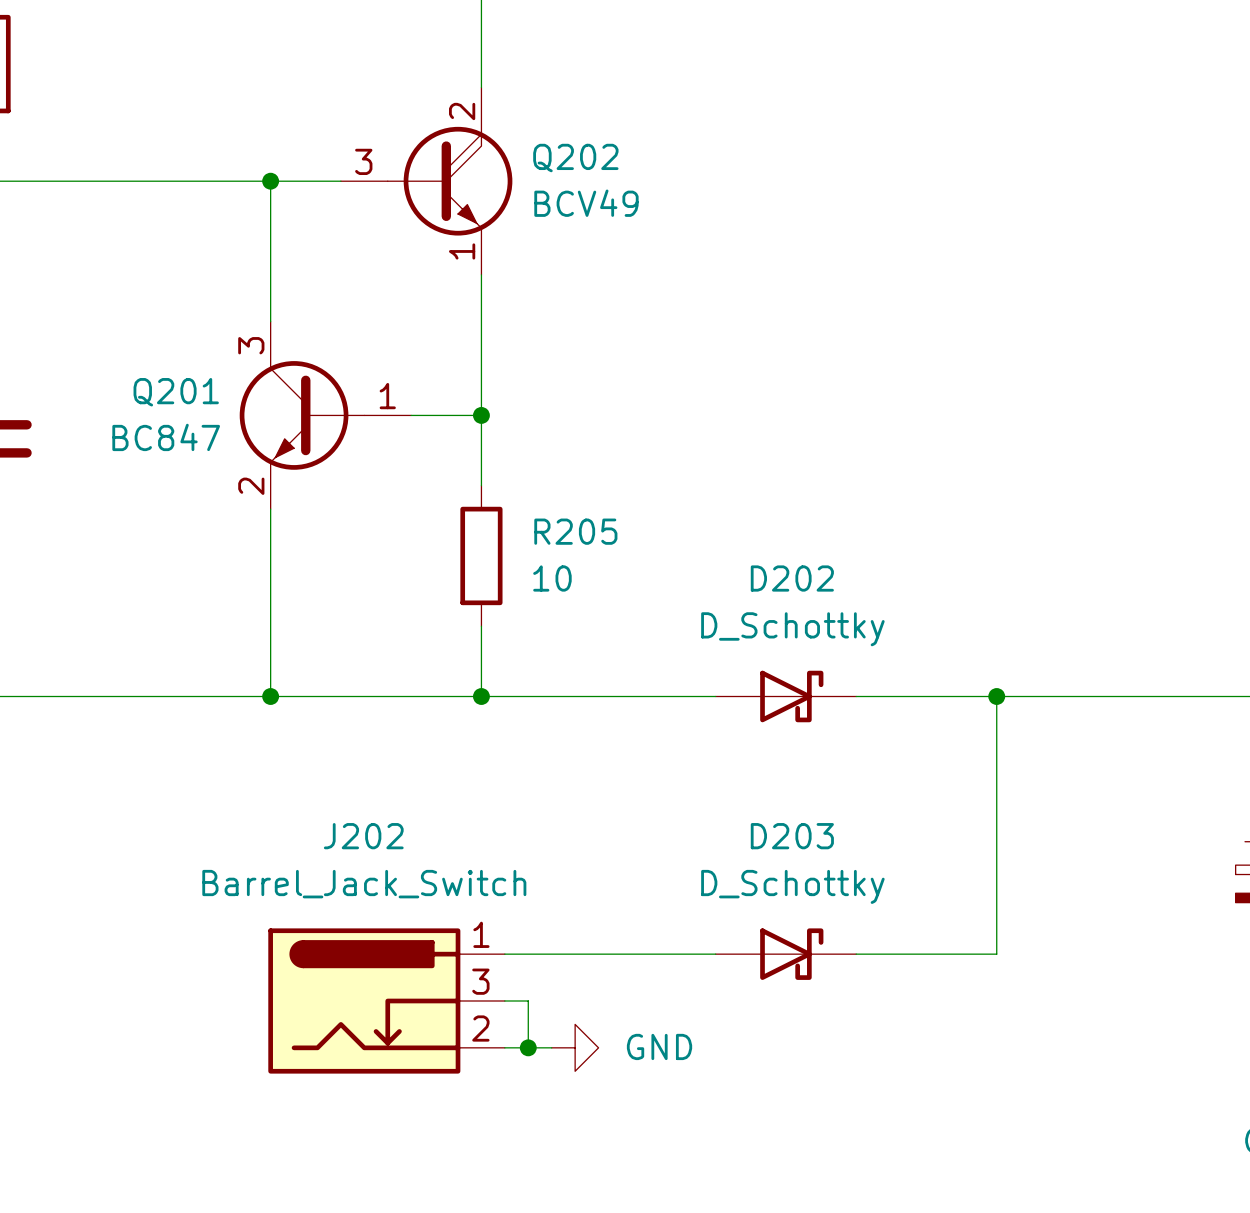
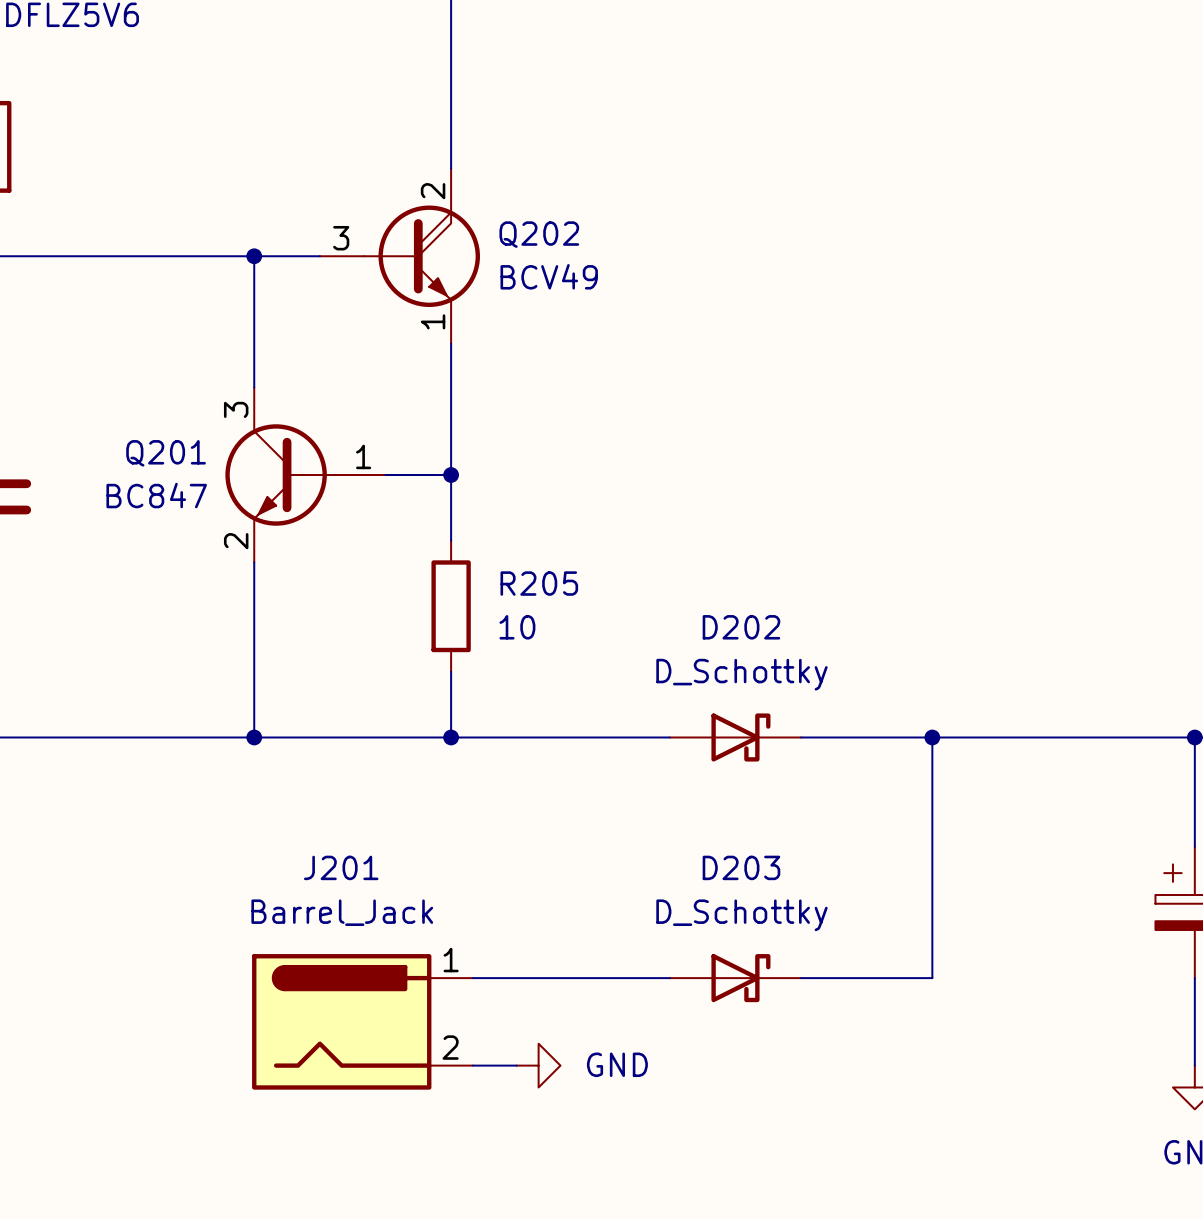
J202: Barrel_Jack_Switch (386, 1000) -> none
J201: none -> Barrel_Jack (362, 1021)
wire: (504, 1000) (528, 1000) (528, 1047) -> none
junction: (528, 1047) -> none

